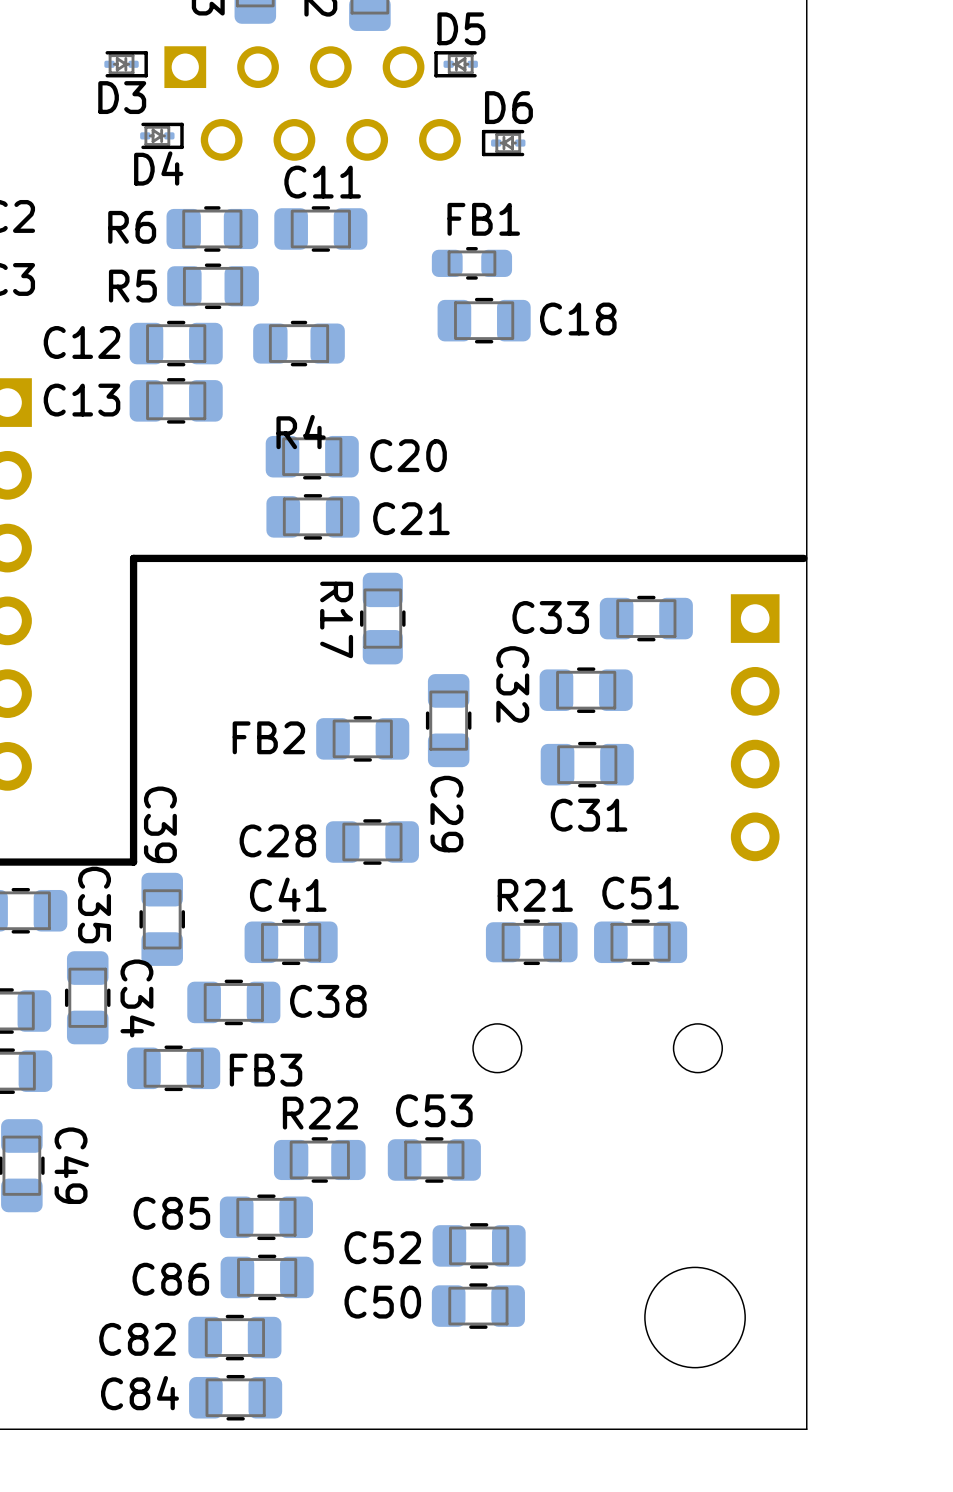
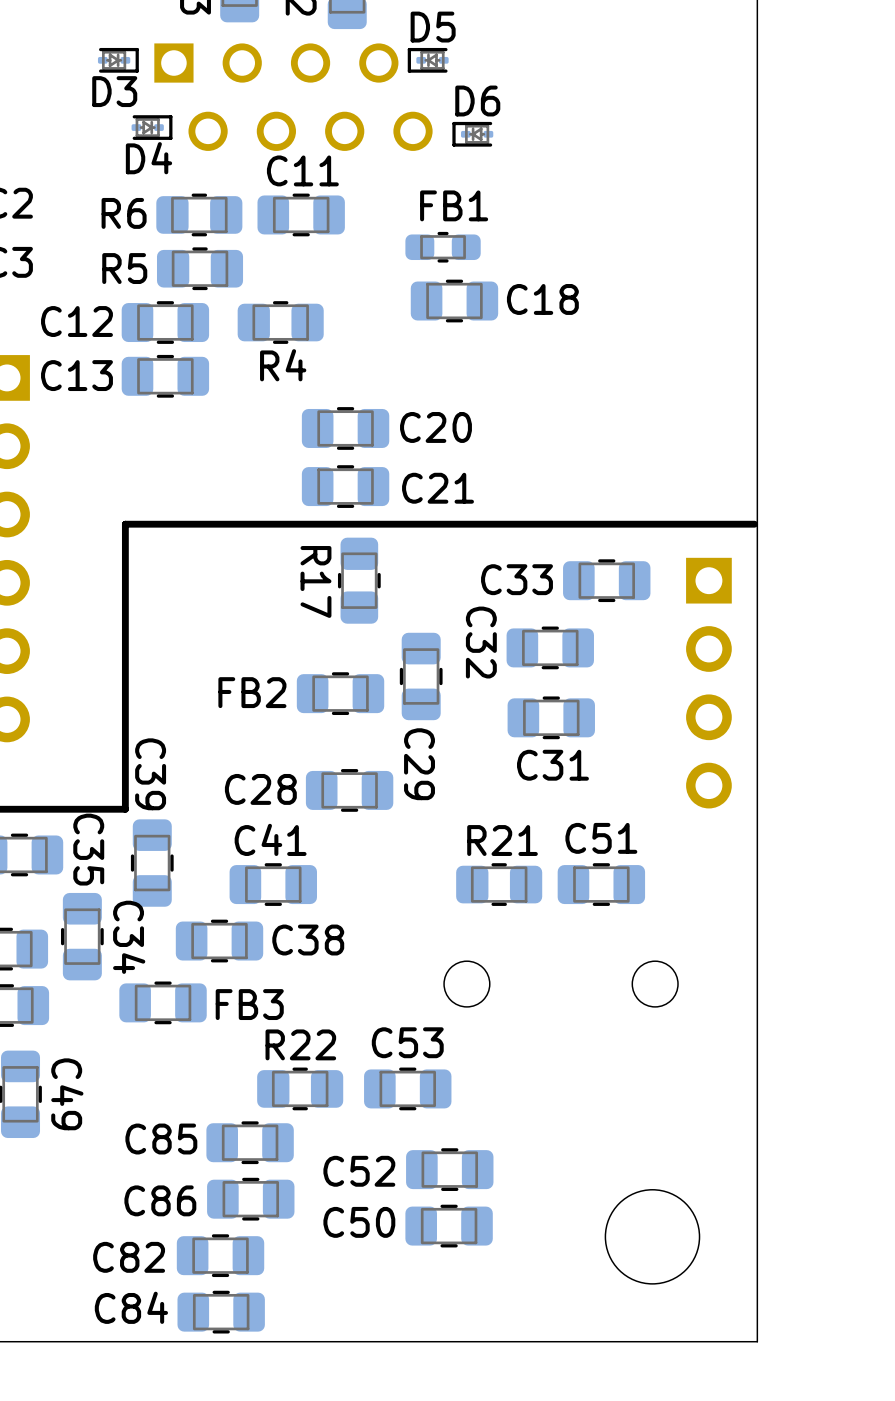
R4 name position: R4 (301, 432) -> R4 (283, 365)
C20 position: (312, 456) -> (345, 428)
C21 position: (312, 516) -> (345, 486)

